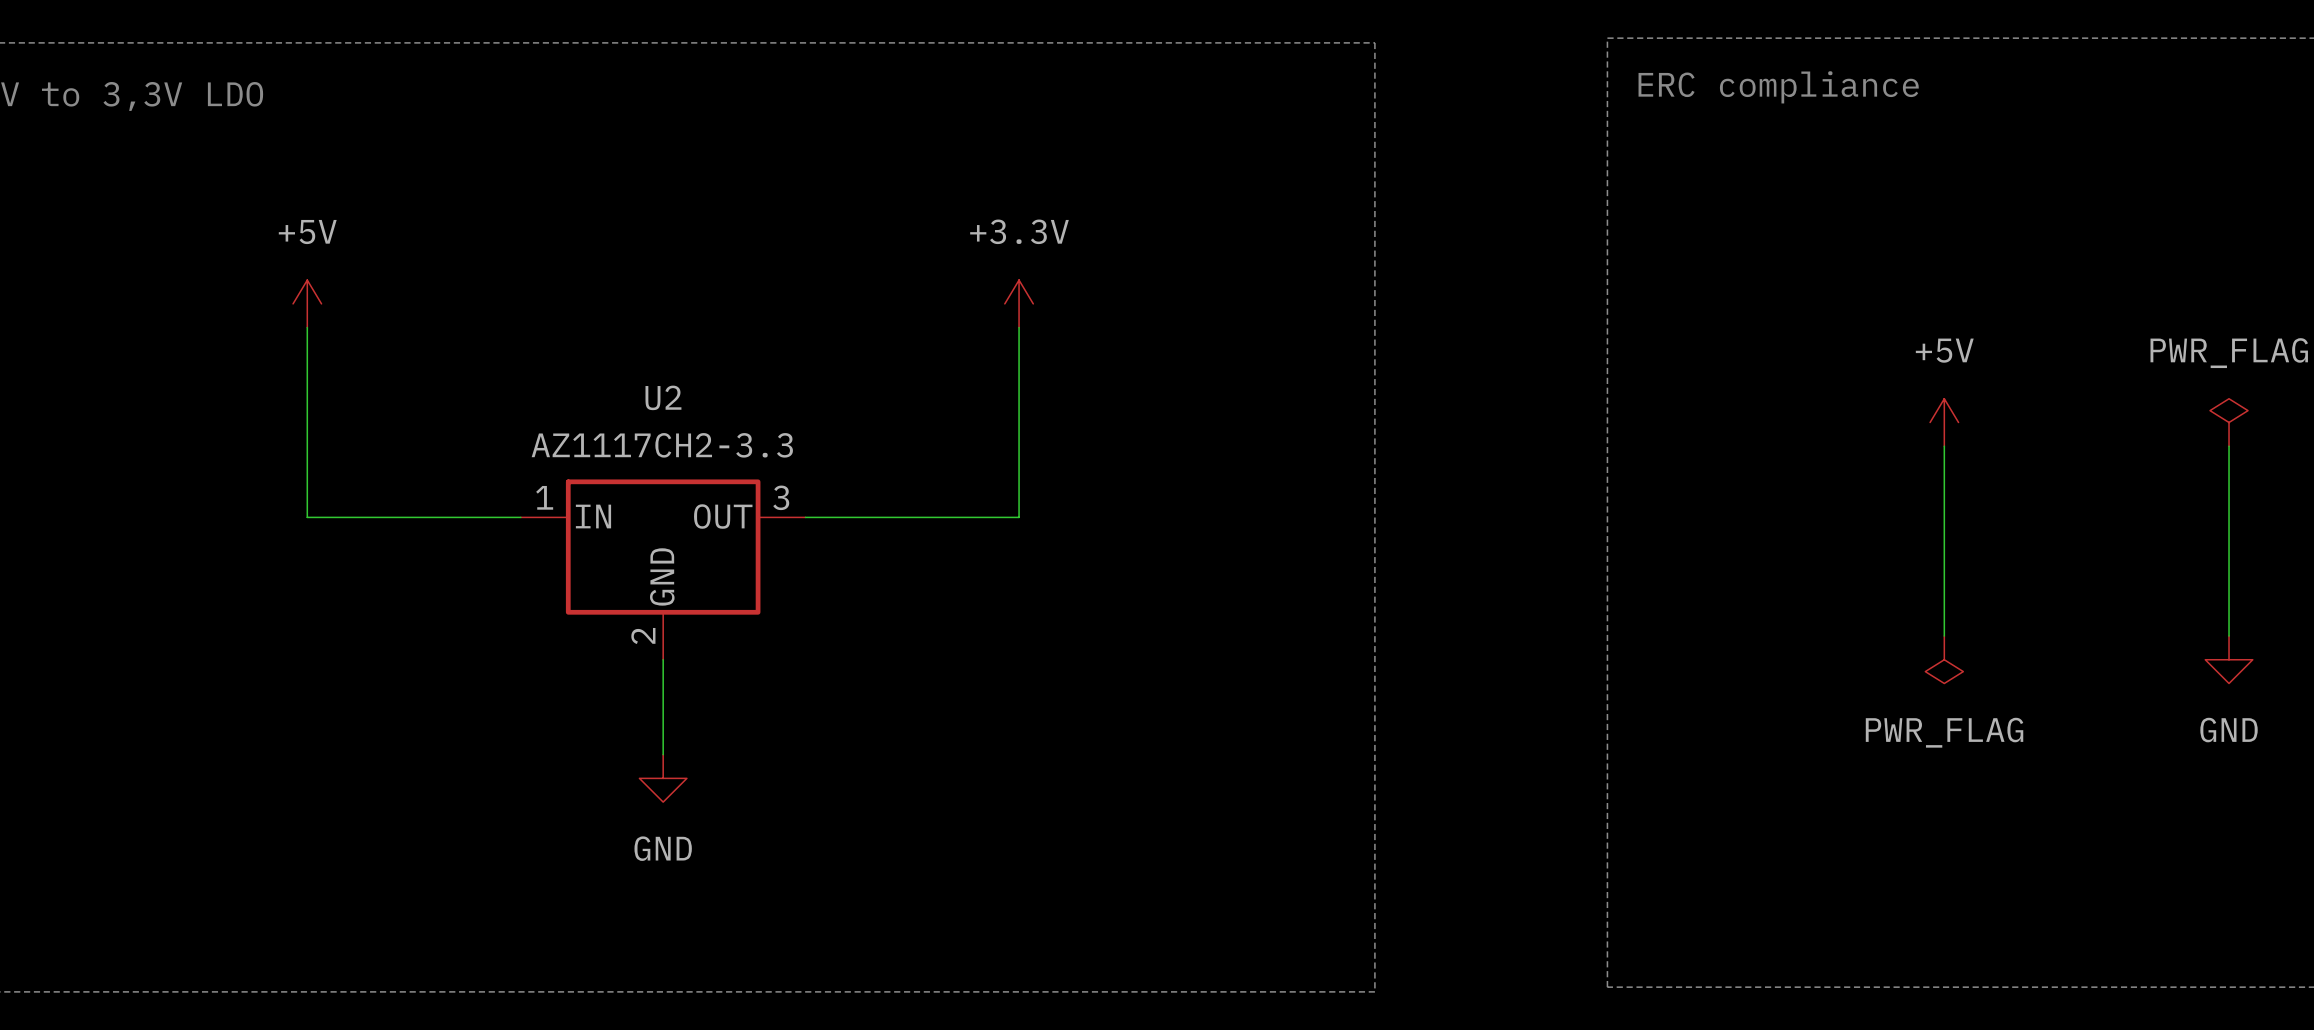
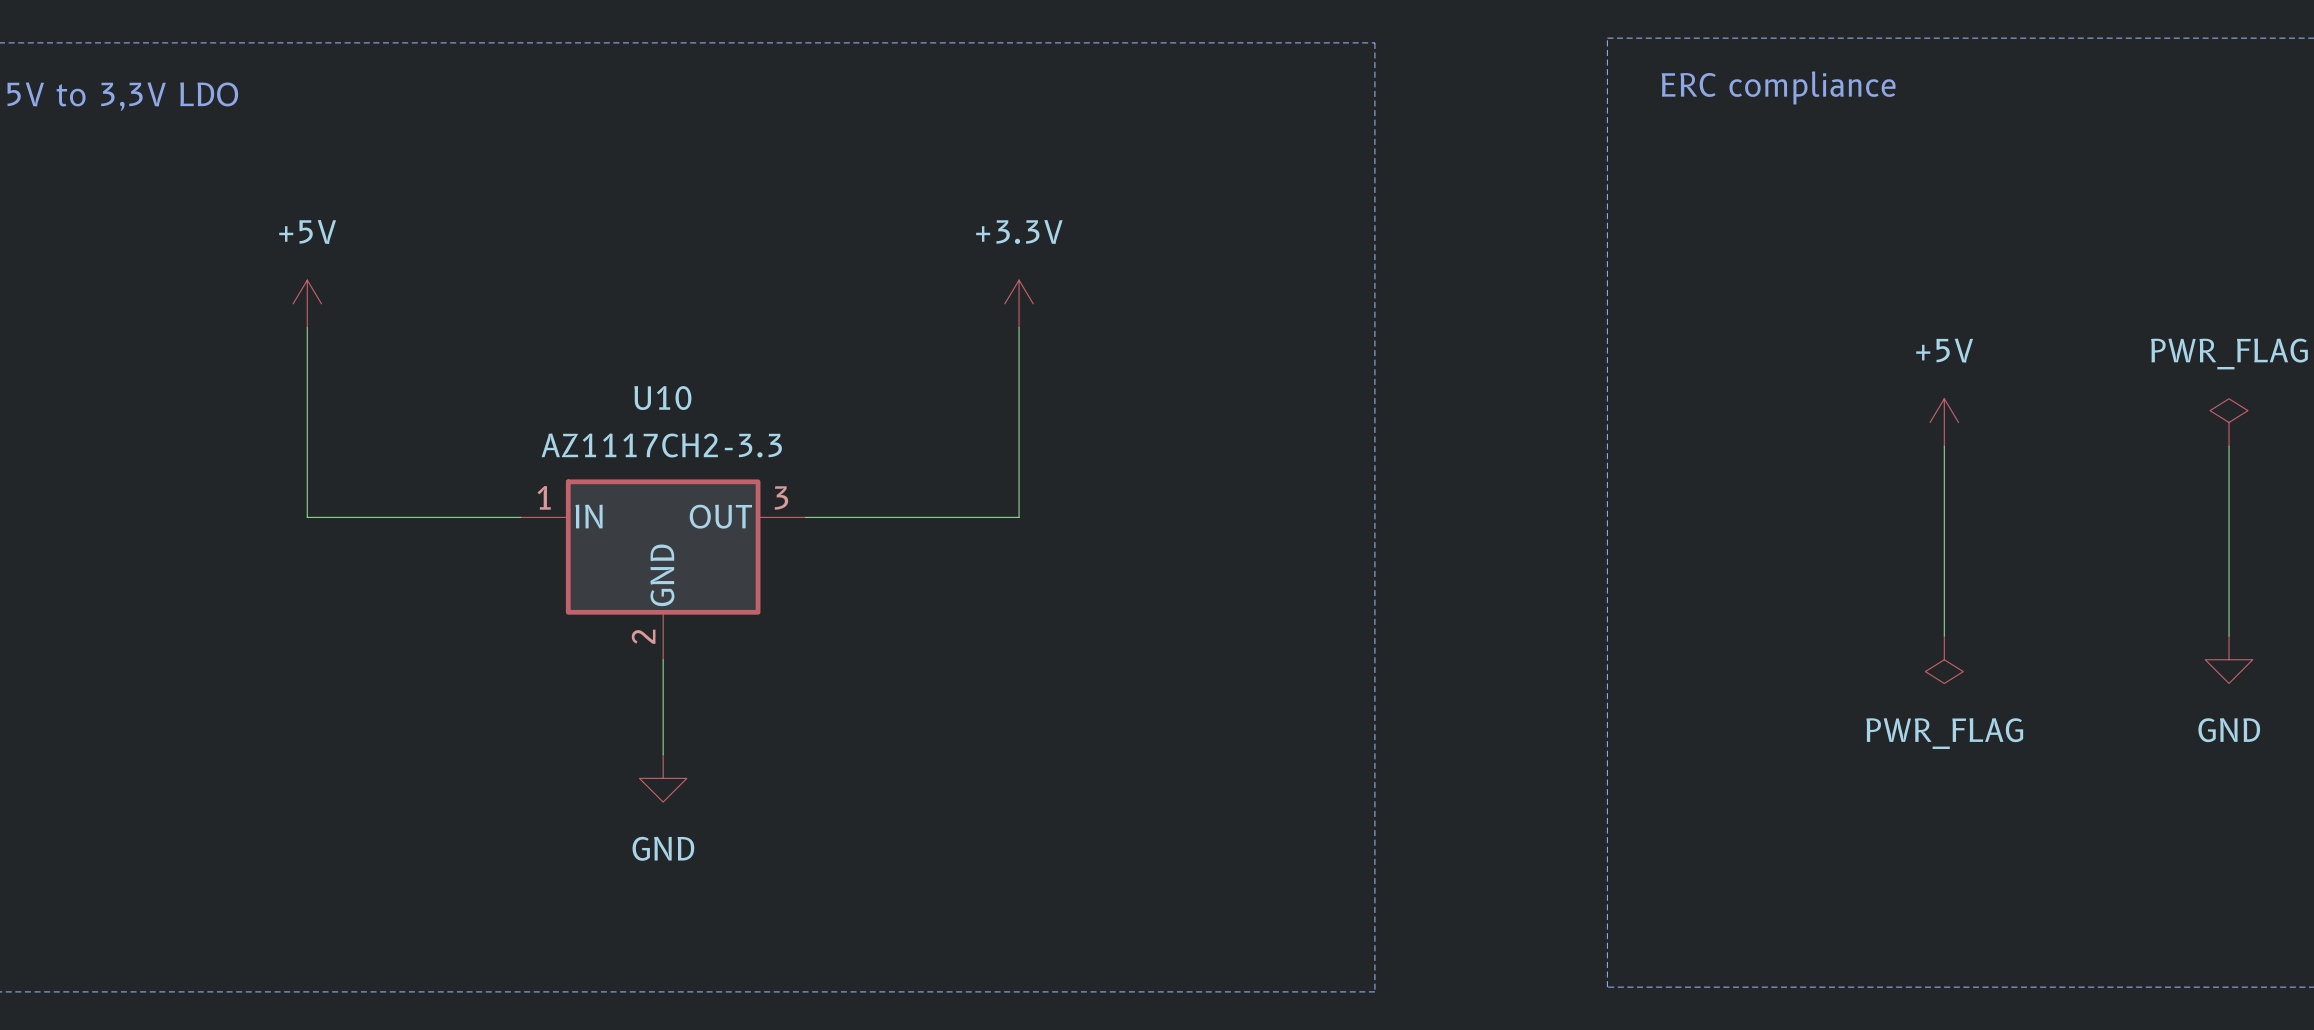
U2 name: U2 (663, 397) -> U10 (662, 398)

